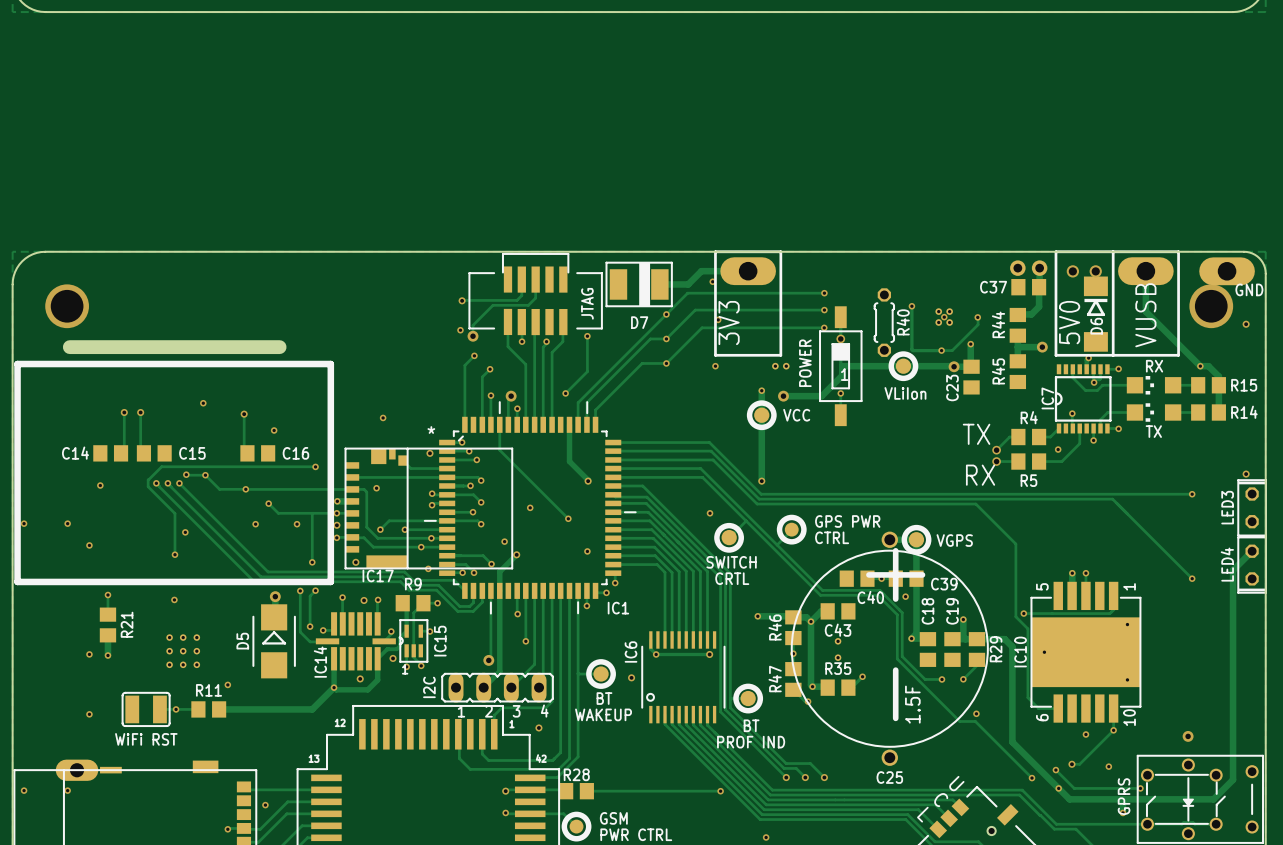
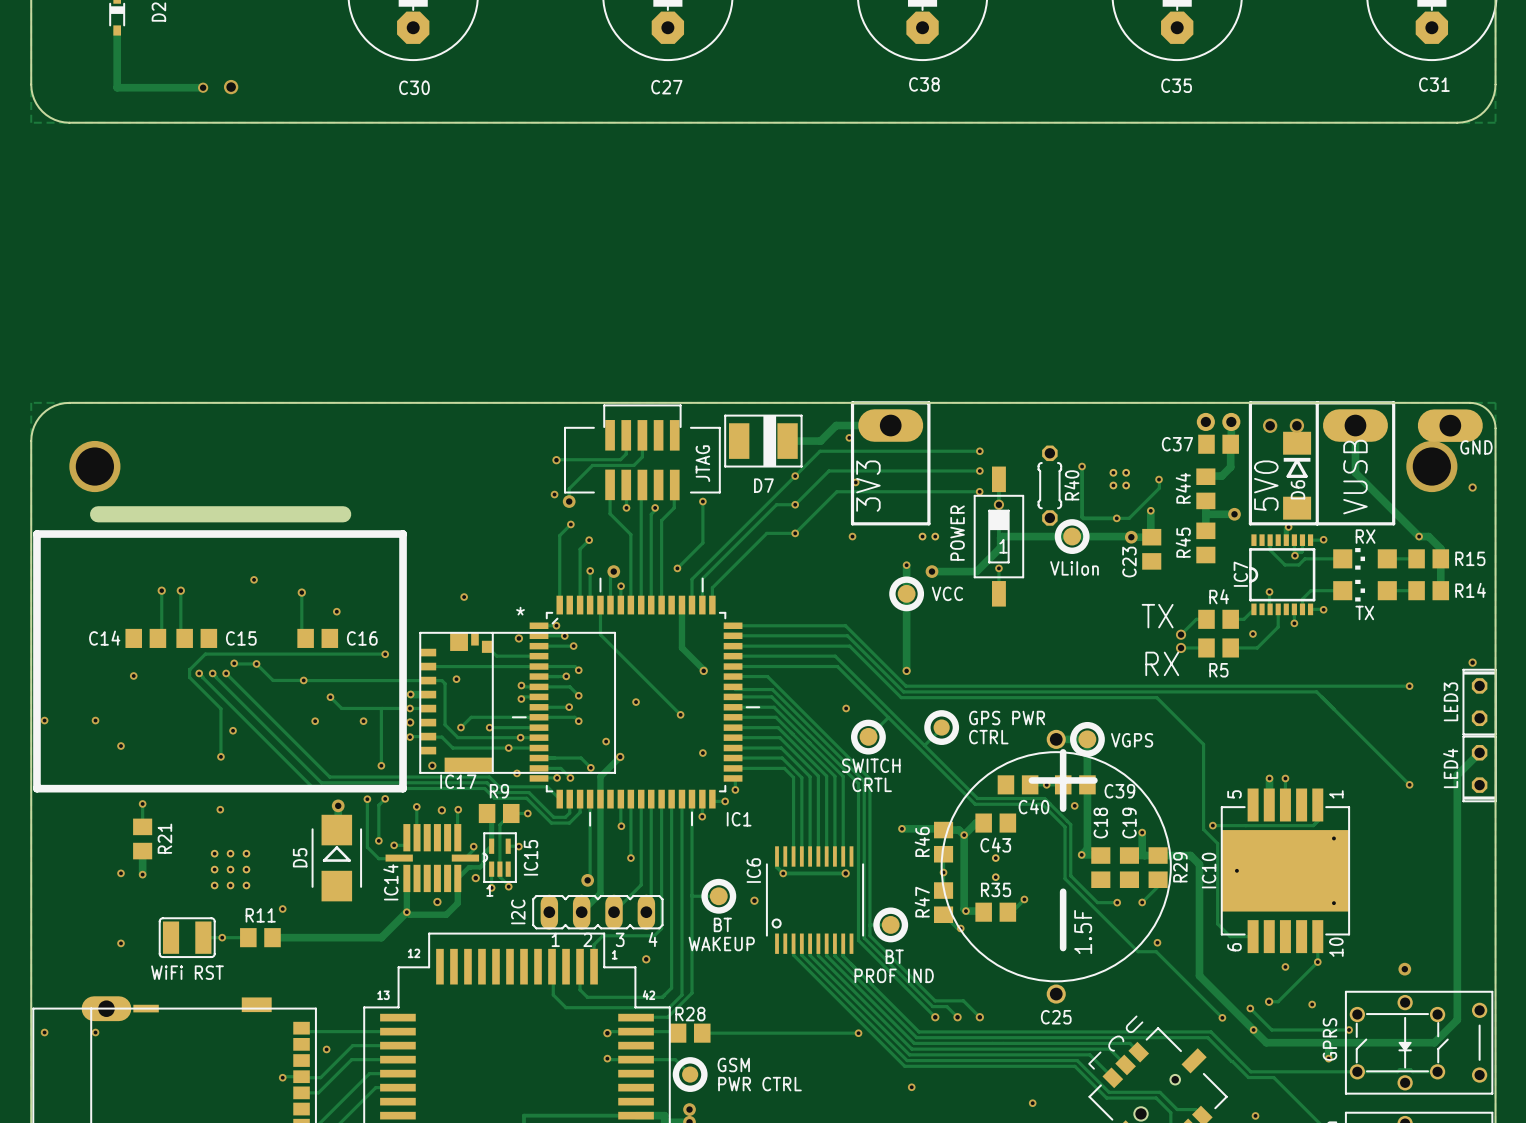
via: (944, 317) -> none

